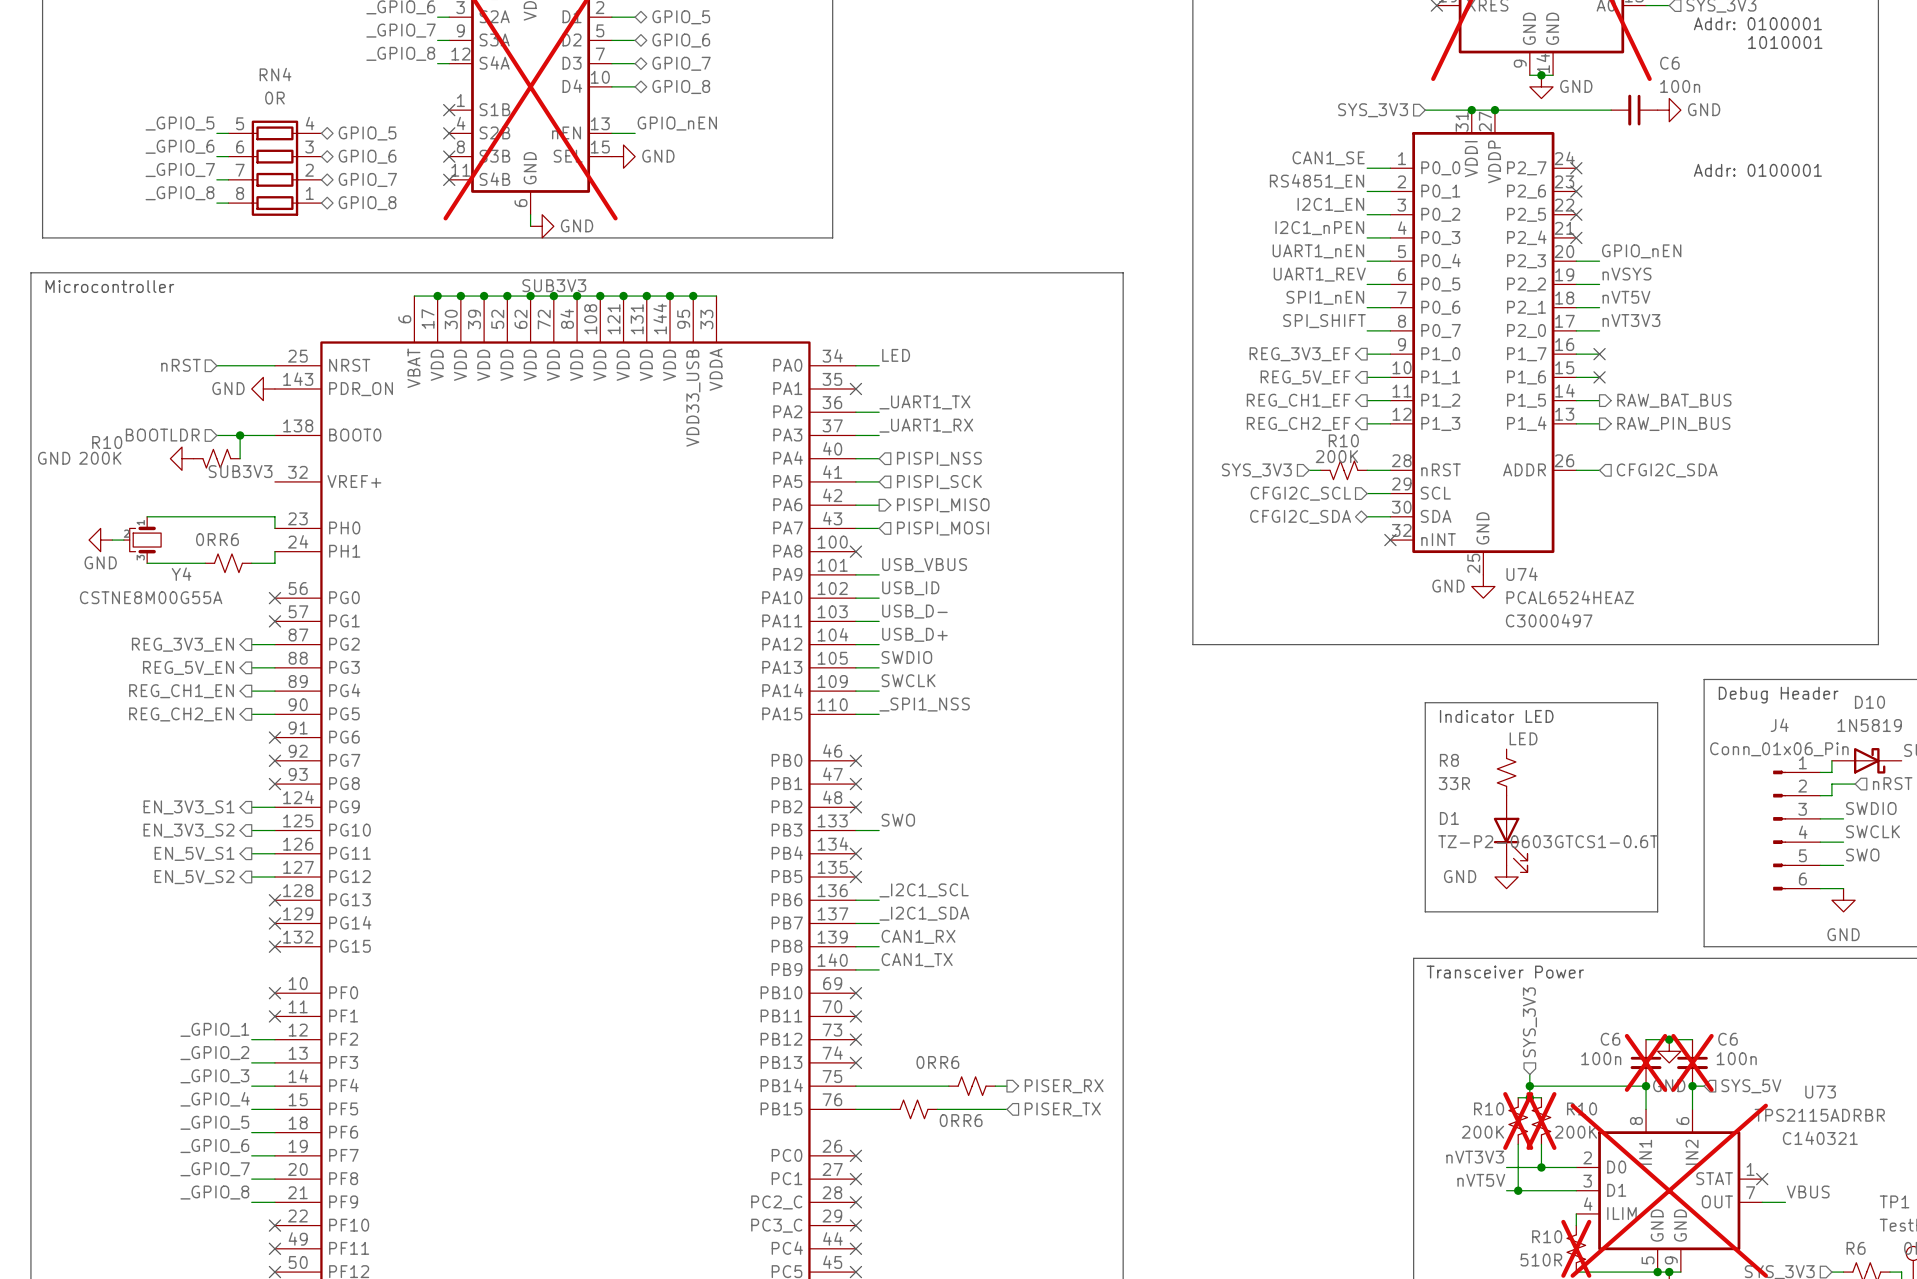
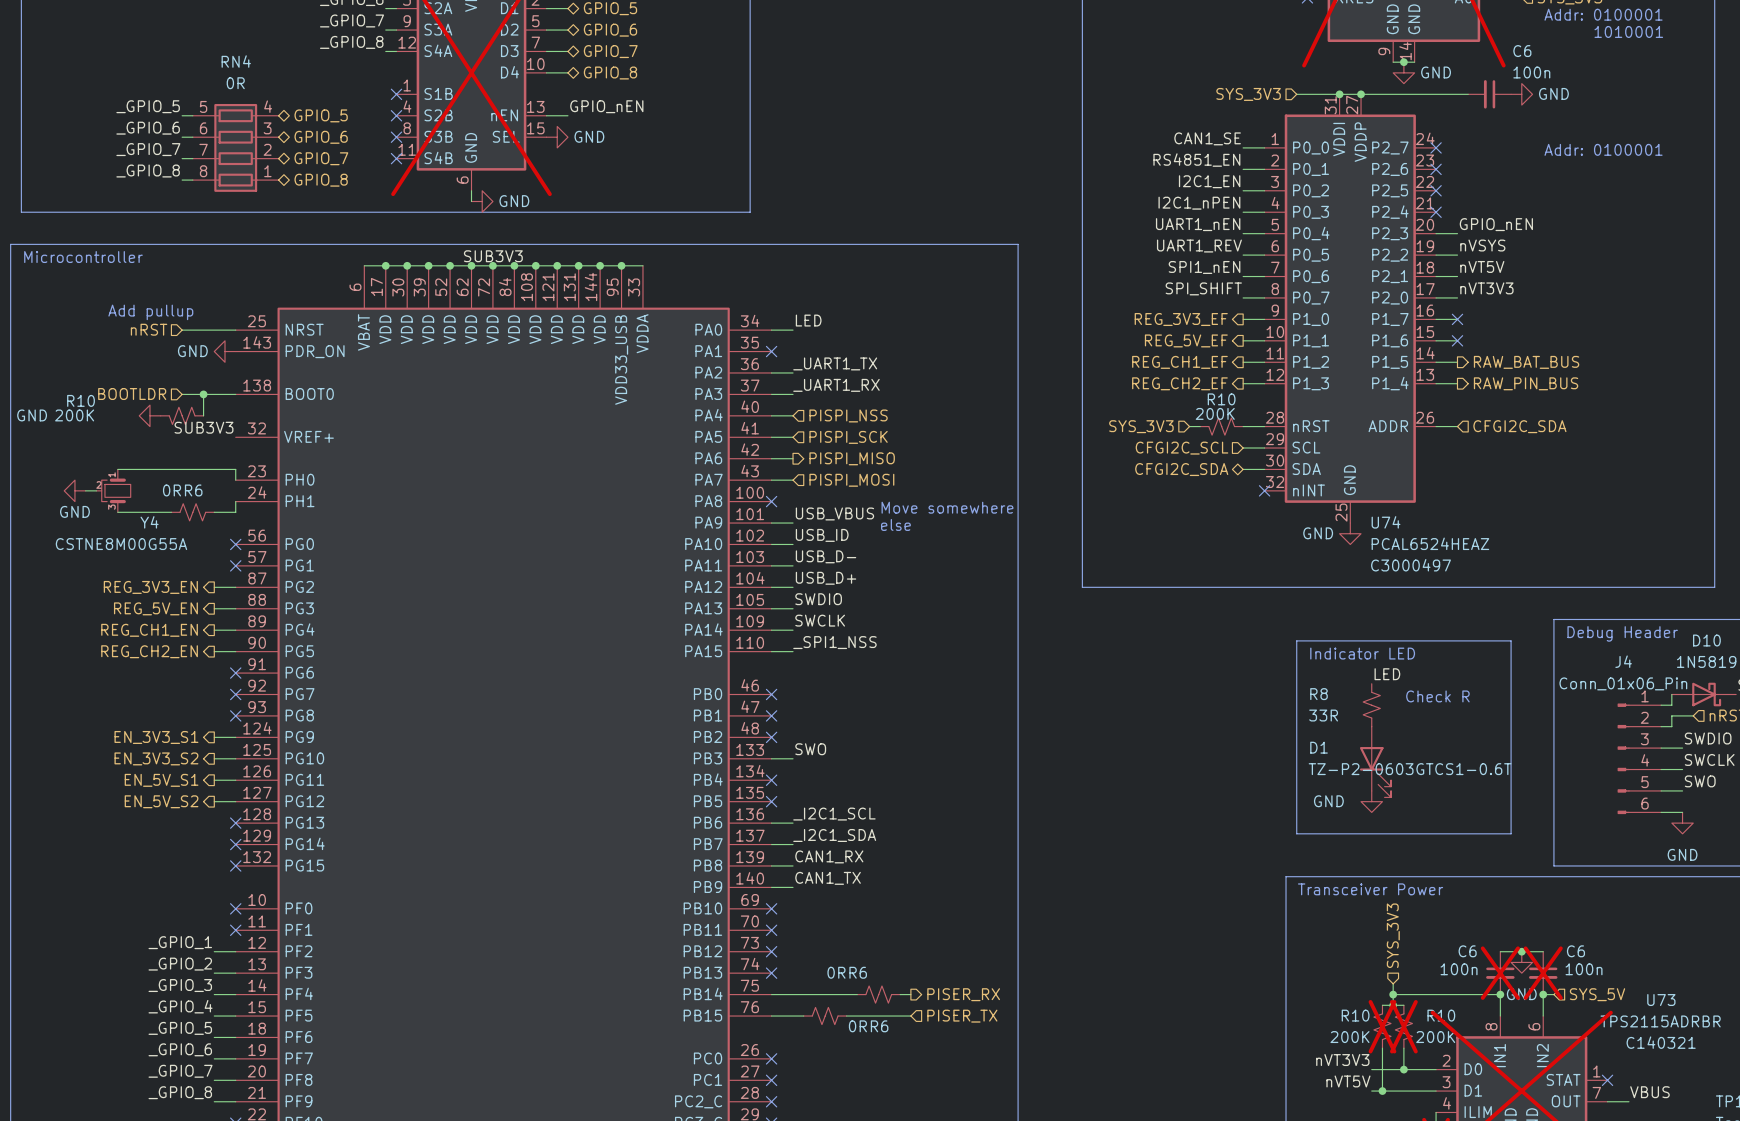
text: none -> Add pullup (150, 312)
text: none -> Move somewhere (947, 507)
text: none -> else (895, 524)
text: none -> Check R (1437, 696)

